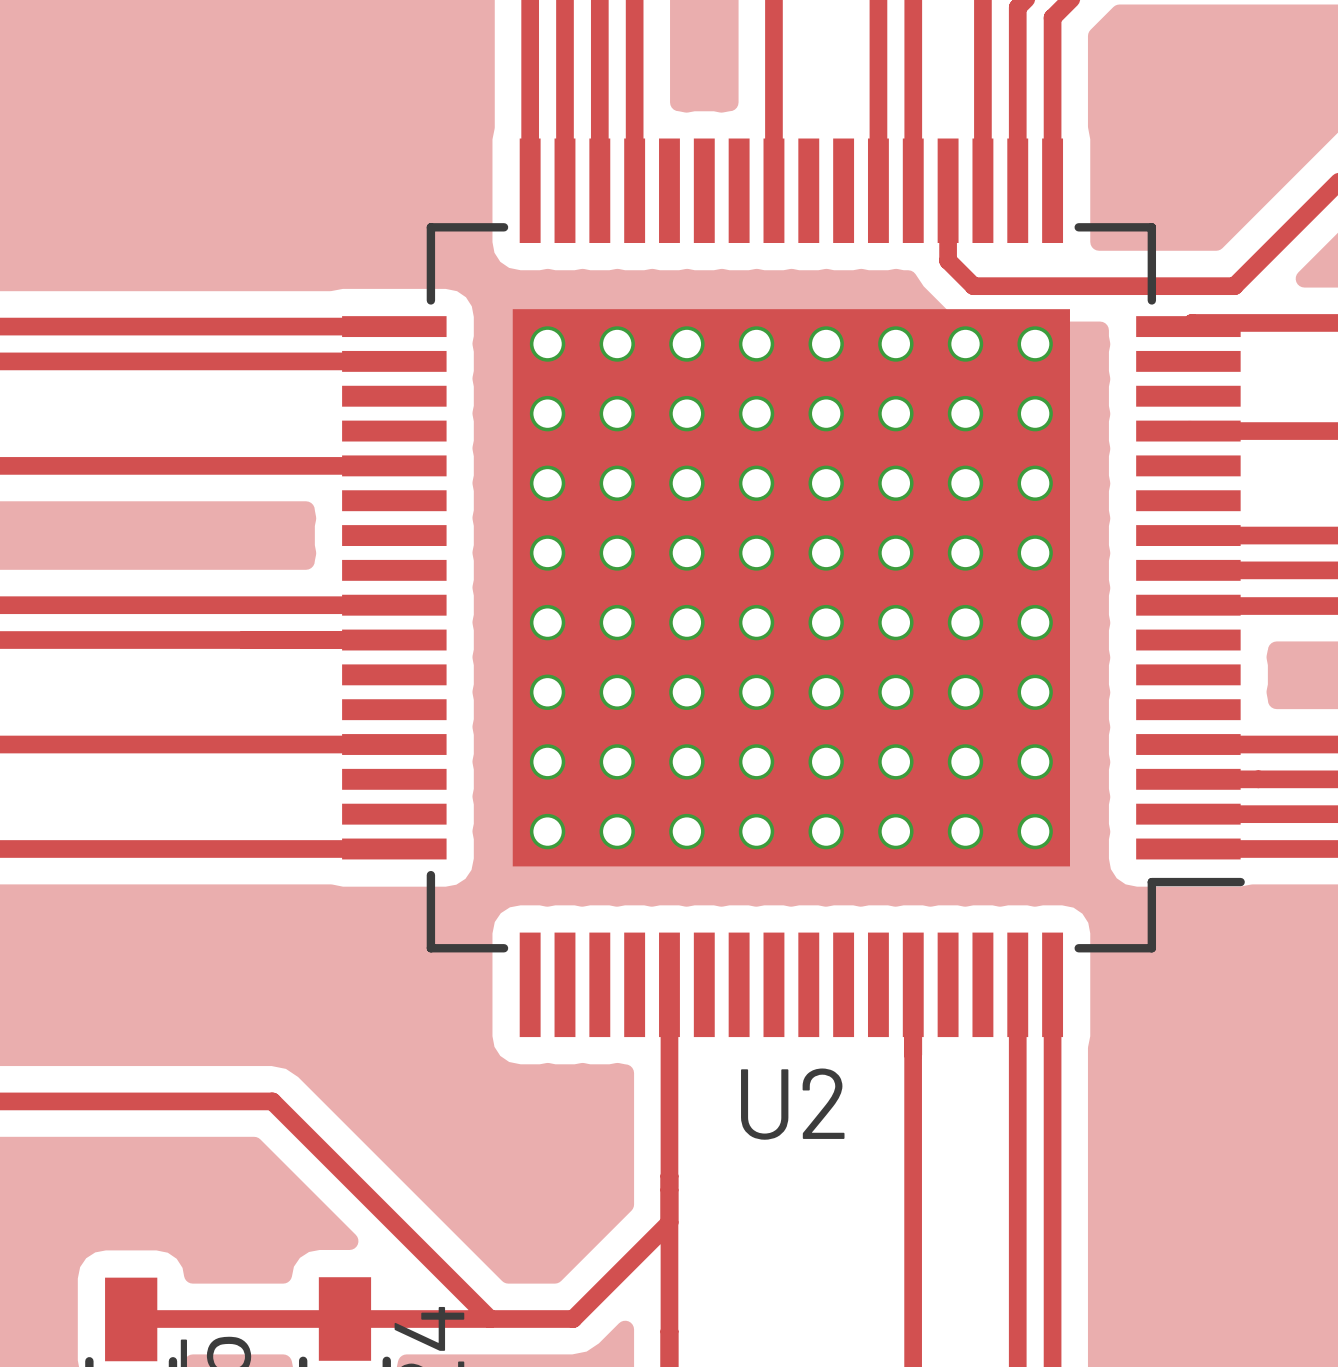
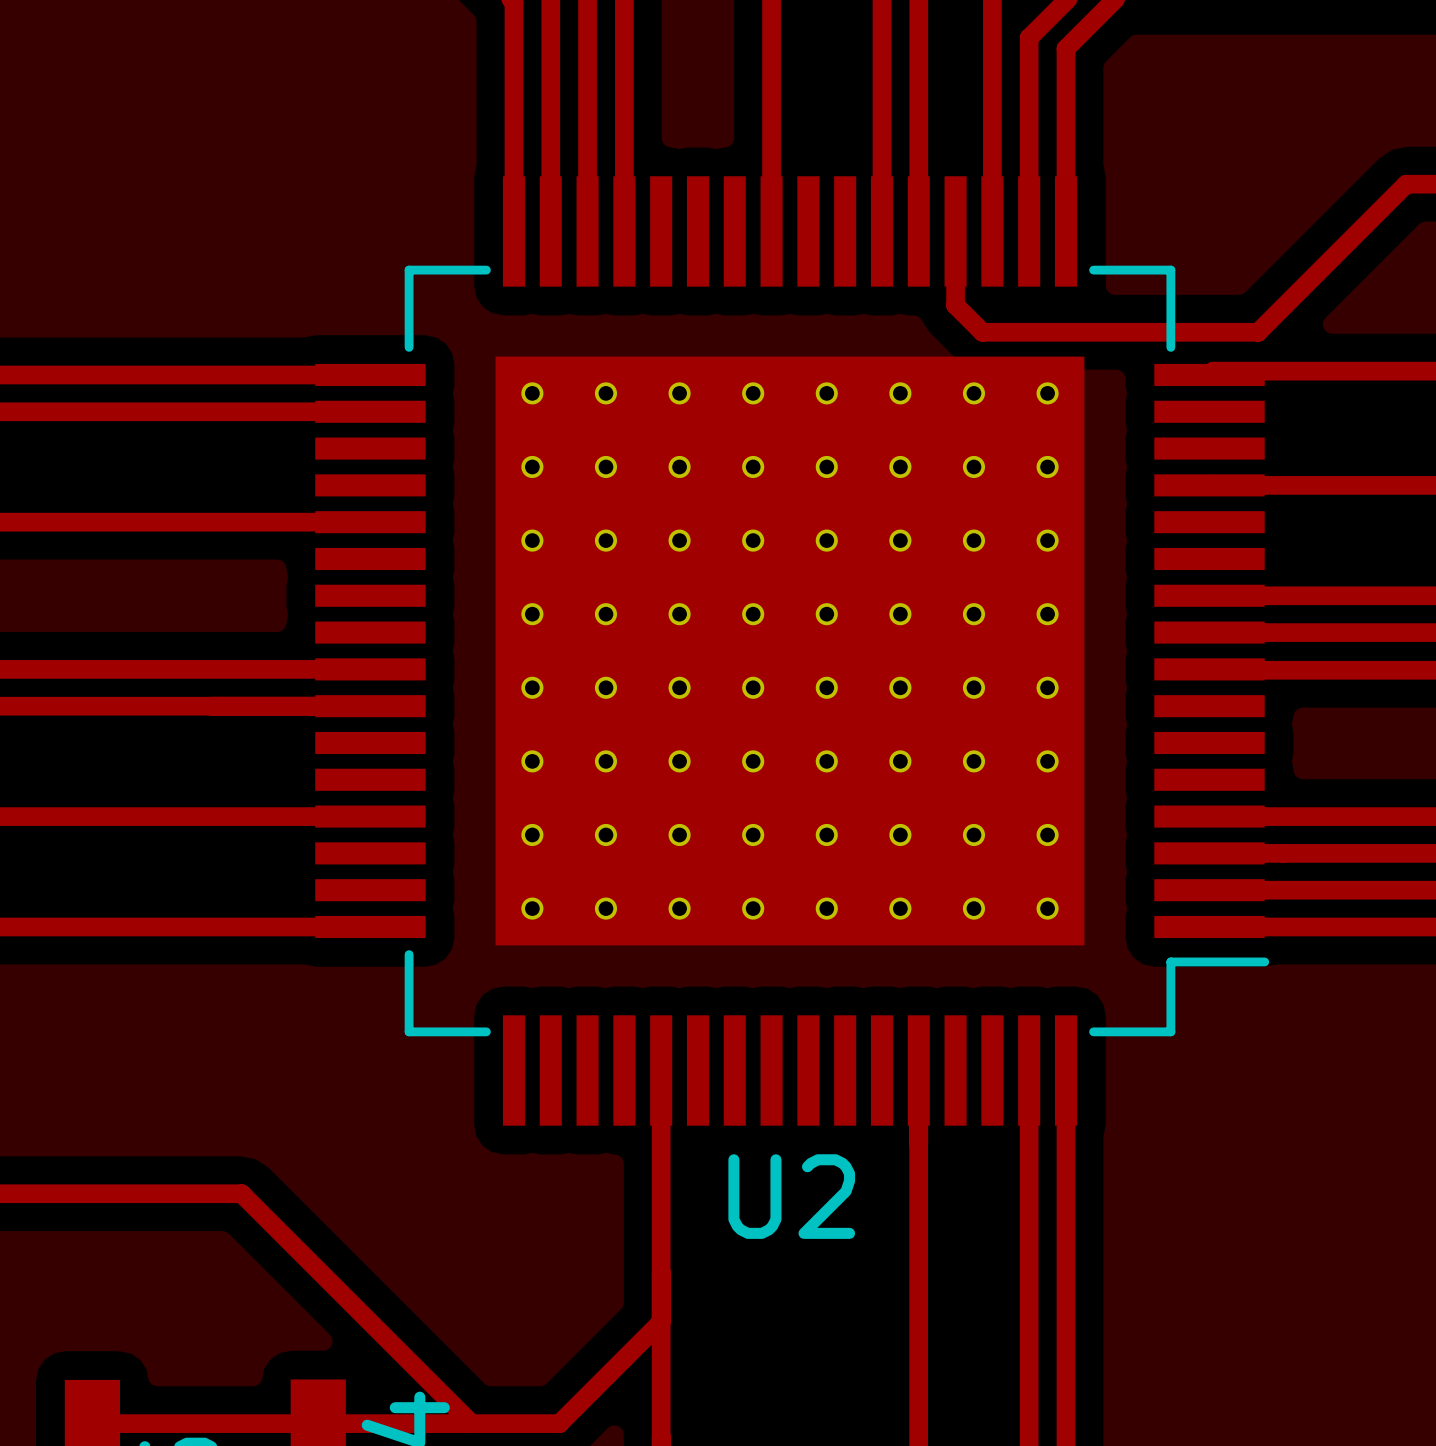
U2 footprint: [342, 138, 1245, 1038] -> [315, 176, 1270, 1126]

